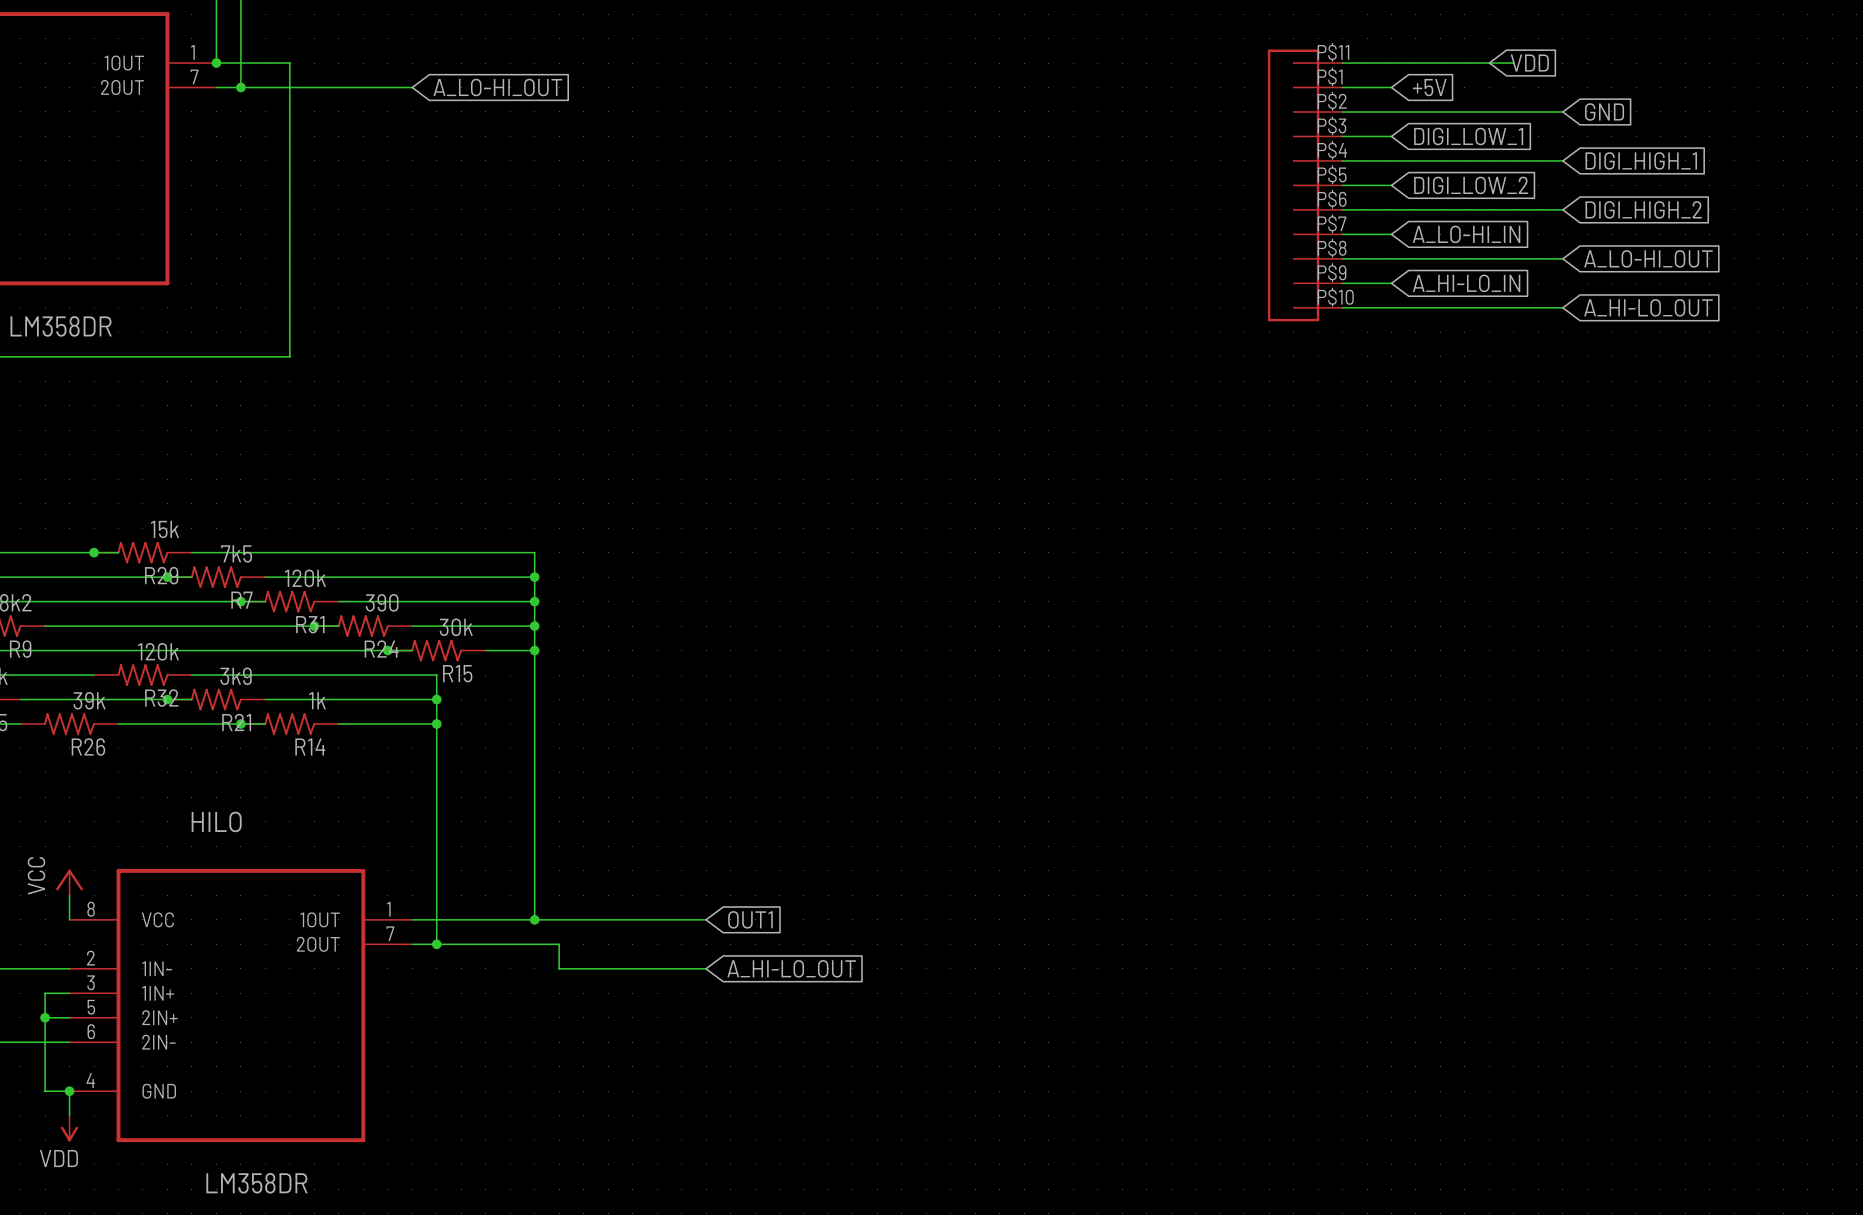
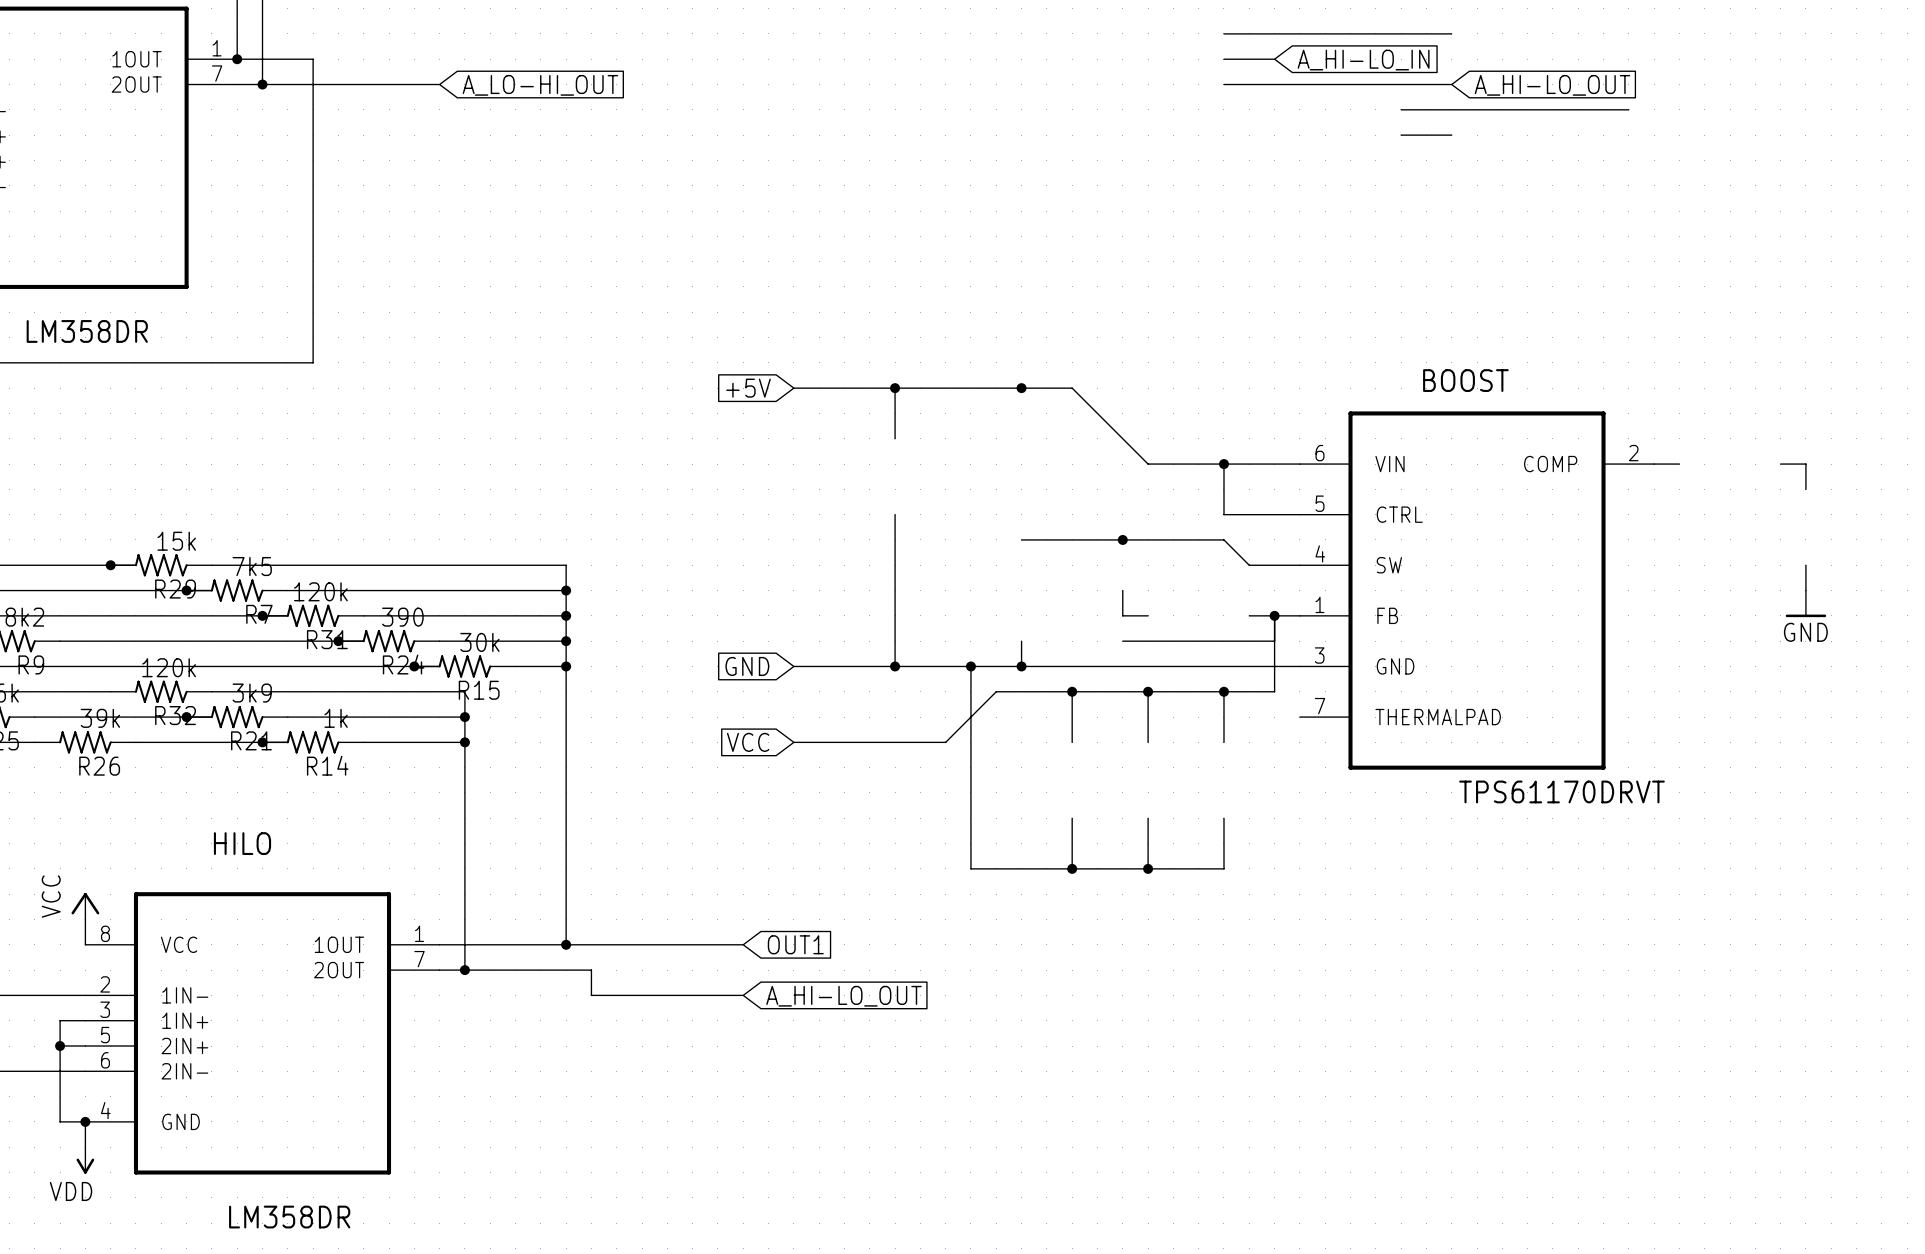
global label: none -> A_HI-LO_IN (1363, 60)
wire: (1342, 63) (1513, 63) -> (1223, 84) (1401, 84)
global label: VDD (1529, 63) -> none
global label: +5V (1429, 87) -> A_HI-LO_OUT (1552, 85)
global label: GND (1604, 111) -> none
global label: DIGI_LOW_1 (1468, 136) -> none
wire: (1342, 160) (1562, 160) -> (1223, 33) (1451, 33)
global label: DIGI_HIGH_1 (1641, 160) -> none
part: (1305, 185) -> none
wire: (1342, 185) (1391, 185) -> (1223, 59) (1274, 59)
global label: DIGI_LOW_2 (1471, 185) -> none
wire: (1342, 209) (1562, 209) -> none
global label: DIGI_HIGH_2 (1643, 209) -> none
wire: (1342, 234) (1391, 234) -> none
global label: A_LO-HI_IN (1466, 234) -> none
wire: (1342, 258) (1562, 258) -> none
global label: A_LO-HI_OUT (1648, 258) -> none
wire: (1342, 283) (1391, 283) -> none
global label: A_HI-LO_IN (1466, 283) -> none
wire: (1342, 307) (1562, 307) -> none
global label: A_HI-LO_OUT (1648, 307) -> none
global label: none -> +5V (748, 388)
wire: none -> (793, 388) (1072, 388) (1148, 464) (1299, 464)
wire: none -> (895, 388) (895, 438)
junction: none -> (895, 388)
junction: none -> (1021, 388)
wire: none -> (1223, 464) (1223, 514) (1299, 514)
junction: none -> (1223, 464)
wire: none -> (1654, 464) (1679, 464)
wire: none -> (1780, 464) (1805, 464) (1805, 489)
wire: none -> (895, 514) (895, 666)
wire: none -> (1021, 539) (1223, 539) (1249, 565) (1299, 565)
junction: none -> (1122, 539)
wire: none -> (1805, 565) (1805, 590)
wire: none -> (1122, 590) (1122, 615) (1148, 615)
BOOST: none -> TPS61170DRVT (1477, 590)
power symbol: none -> GND (1805, 603)
wire: none -> (1249, 615) (1299, 615)
wire: none -> (1274, 615) (1274, 691) (996, 691) (945, 742) (793, 742)
junction: none -> (1274, 615)
wire: none -> (1021, 641) (1021, 666)
wire: none -> (1122, 641) (1274, 641)
global label: none -> GND (747, 666)
wire: none -> (793, 666) (1299, 666)
junction: none -> (895, 666)
wire: none -> (970, 666) (970, 868) (1223, 868) (1223, 818)
junction: none -> (970, 666)
junction: none -> (1021, 666)
wire: none -> (1072, 691) (1072, 742)
junction: none -> (1072, 691)
wire: none -> (1148, 691) (1148, 742)
junction: none -> (1148, 691)
wire: none -> (1223, 691) (1223, 742)
junction: none -> (1223, 691)
global label: none -> VCC (748, 742)
wire: none -> (1072, 818) (1072, 868)
wire: none -> (1148, 818) (1148, 868)
junction: none -> (1072, 868)
junction: none -> (1148, 868)

